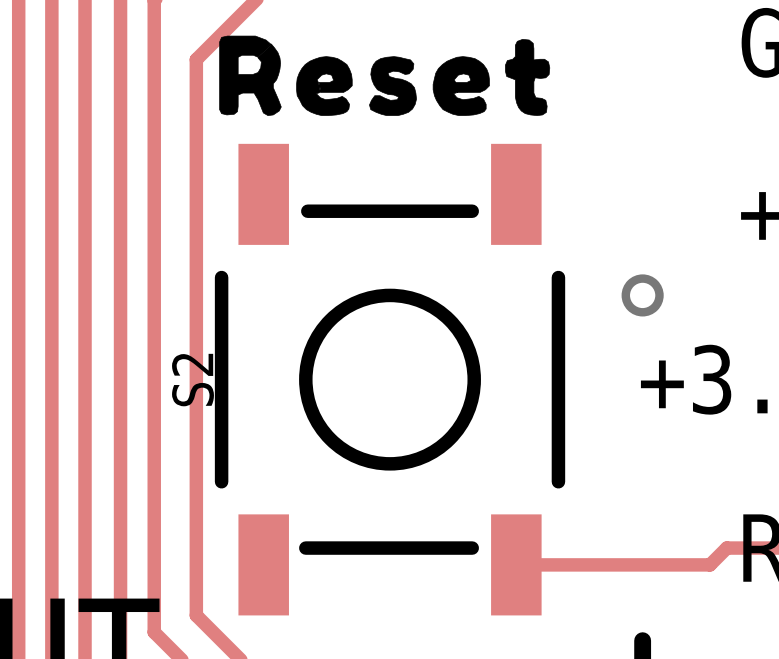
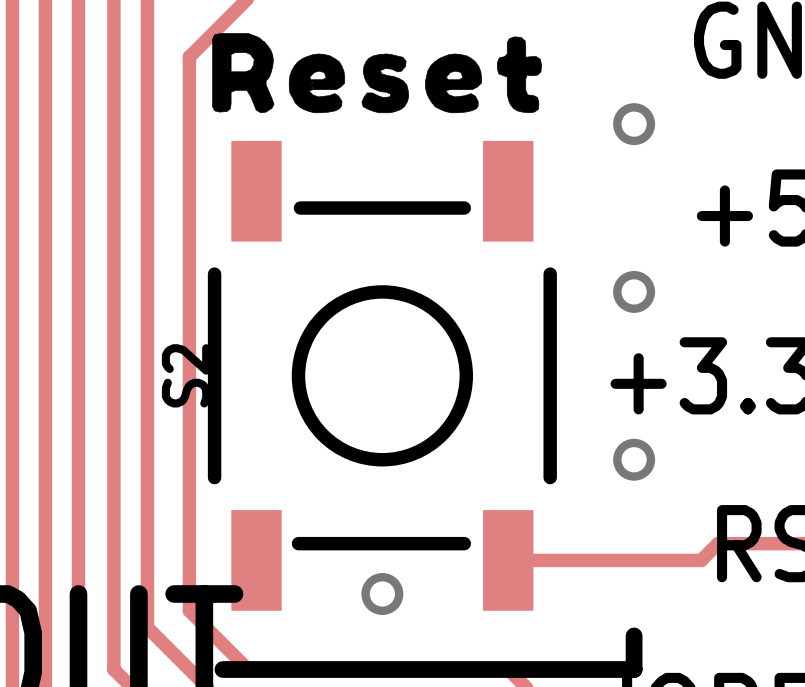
via: none -> (634, 124)
via: none -> (634, 459)
via: none -> (382, 593)

